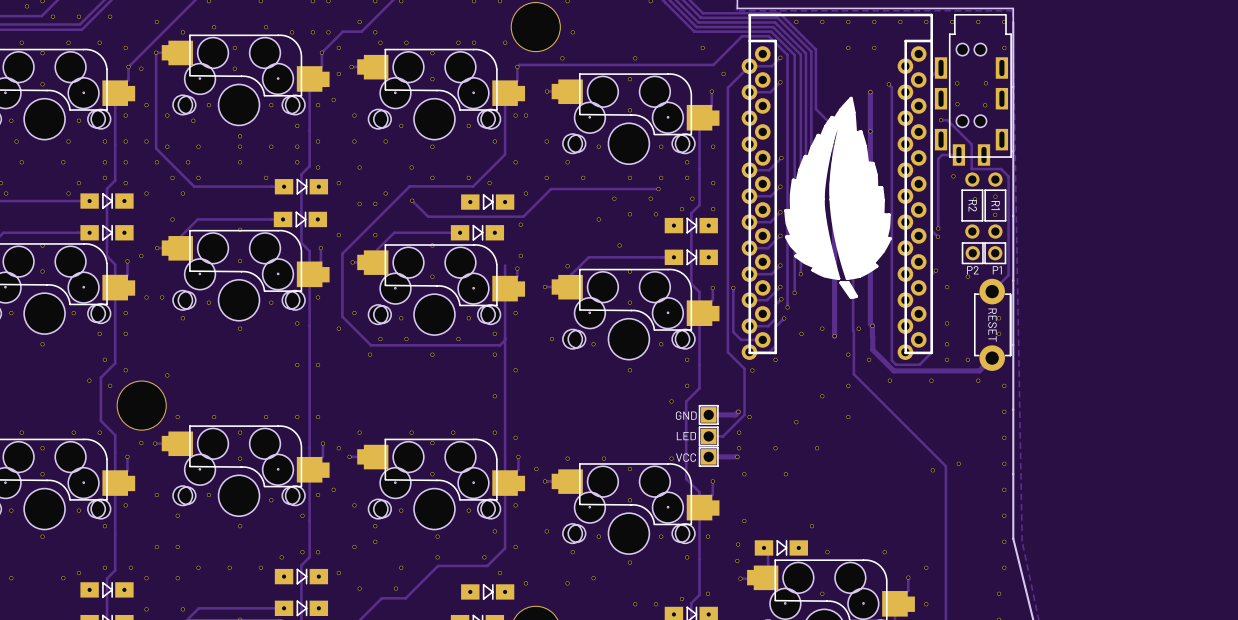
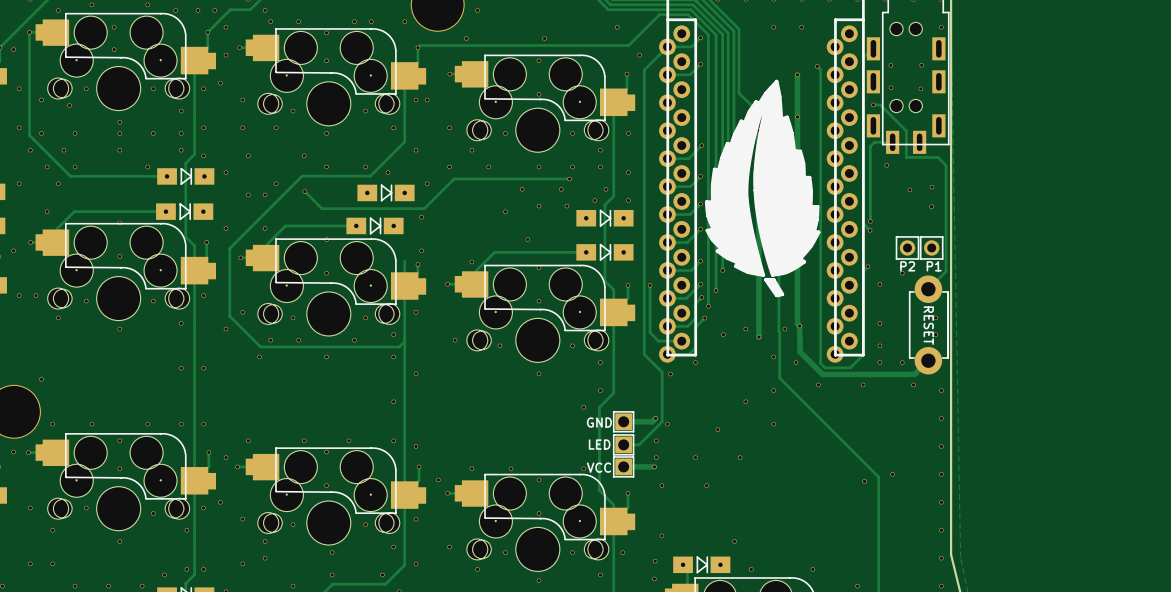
part: (972, 205) -> none
part: (995, 205) -> none

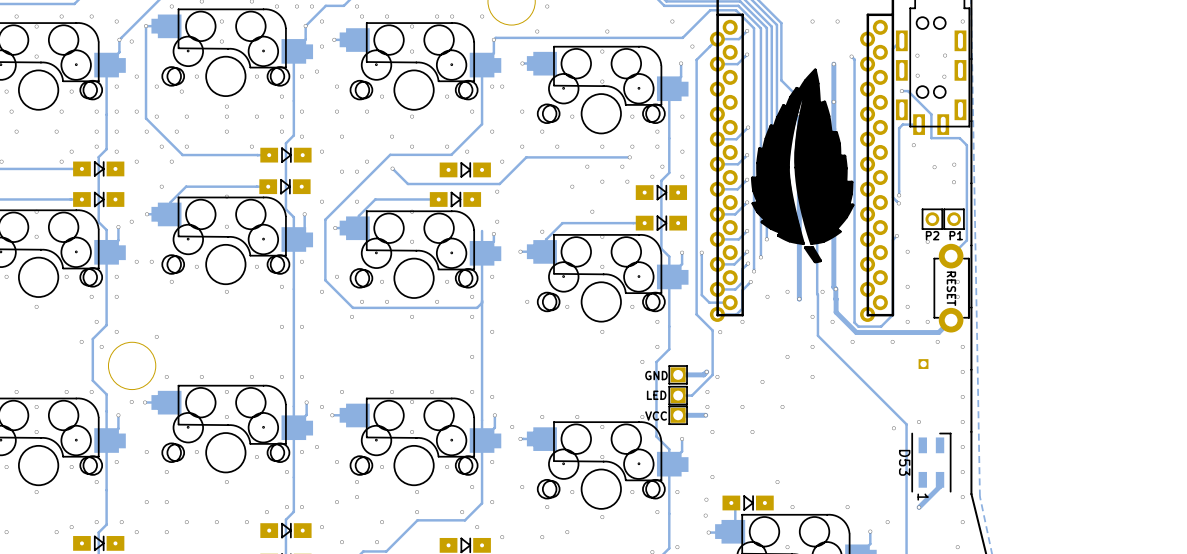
part: none -> (923, 364)
D53: none -> (931, 462)
track: none -> (940, 479) (940, 486) (919, 507)
via: none -> (919, 507)

